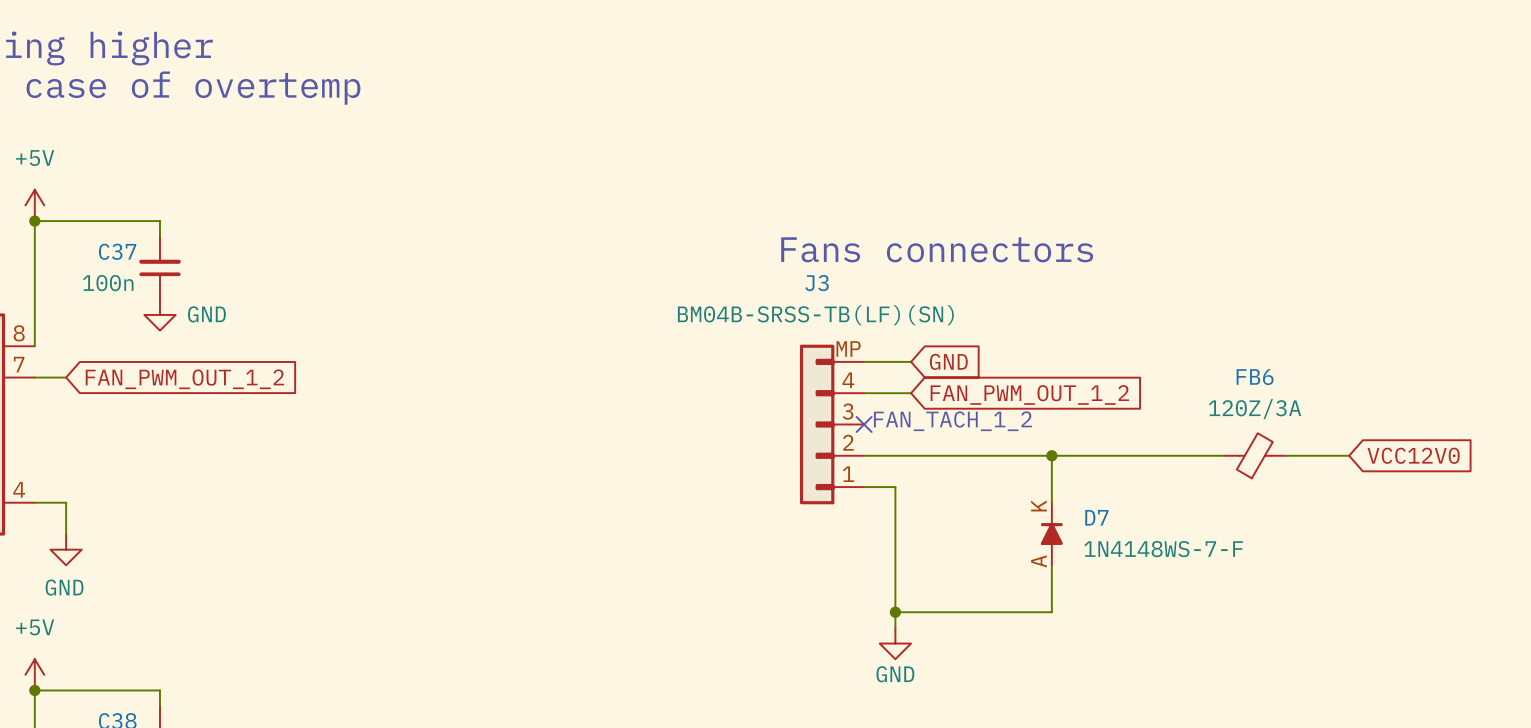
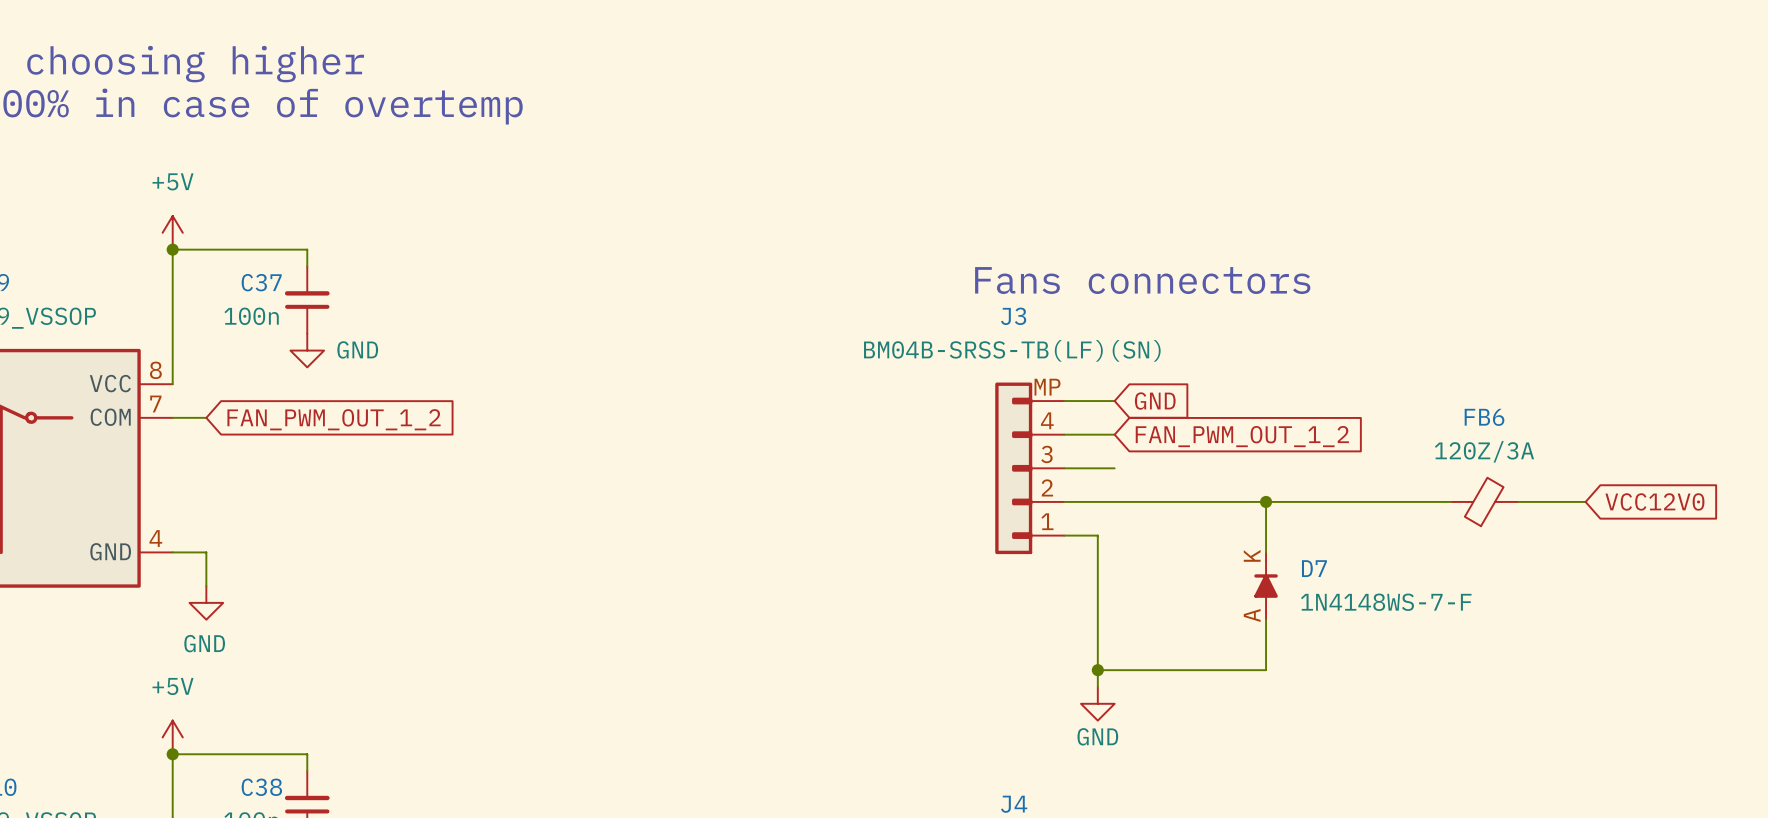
text: FAN_TACH_1_2 (952, 421) -> none
wire: none -> (1064, 468) (1114, 468)
no-connect mark: (864, 424) -> none

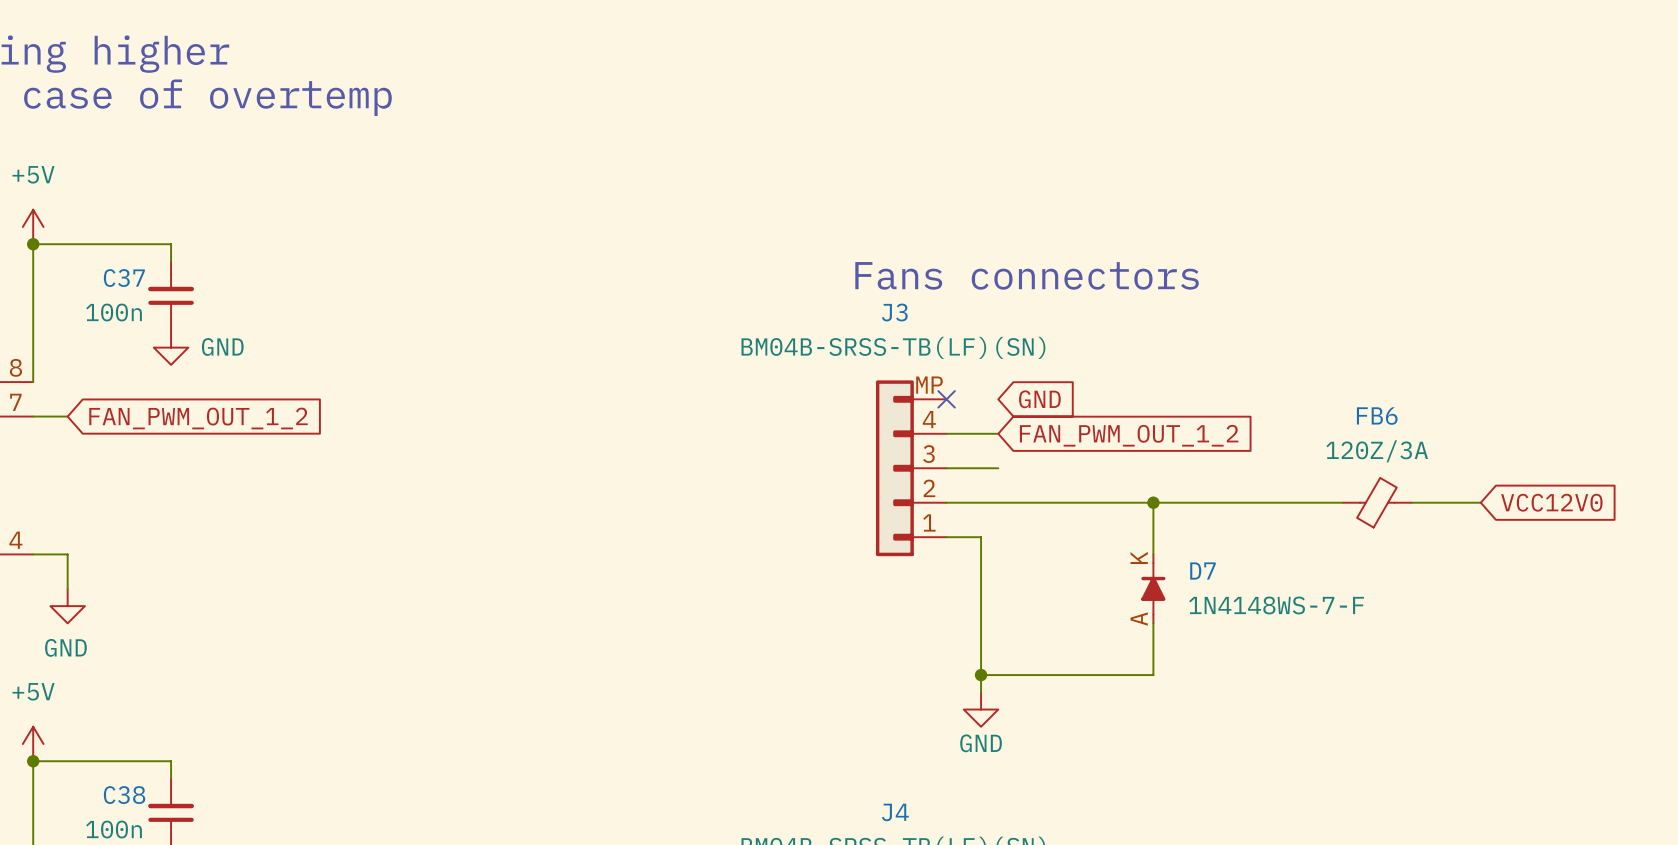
wire: (1064, 401) (1114, 401) -> none
no-connect mark: none -> (946, 399)

